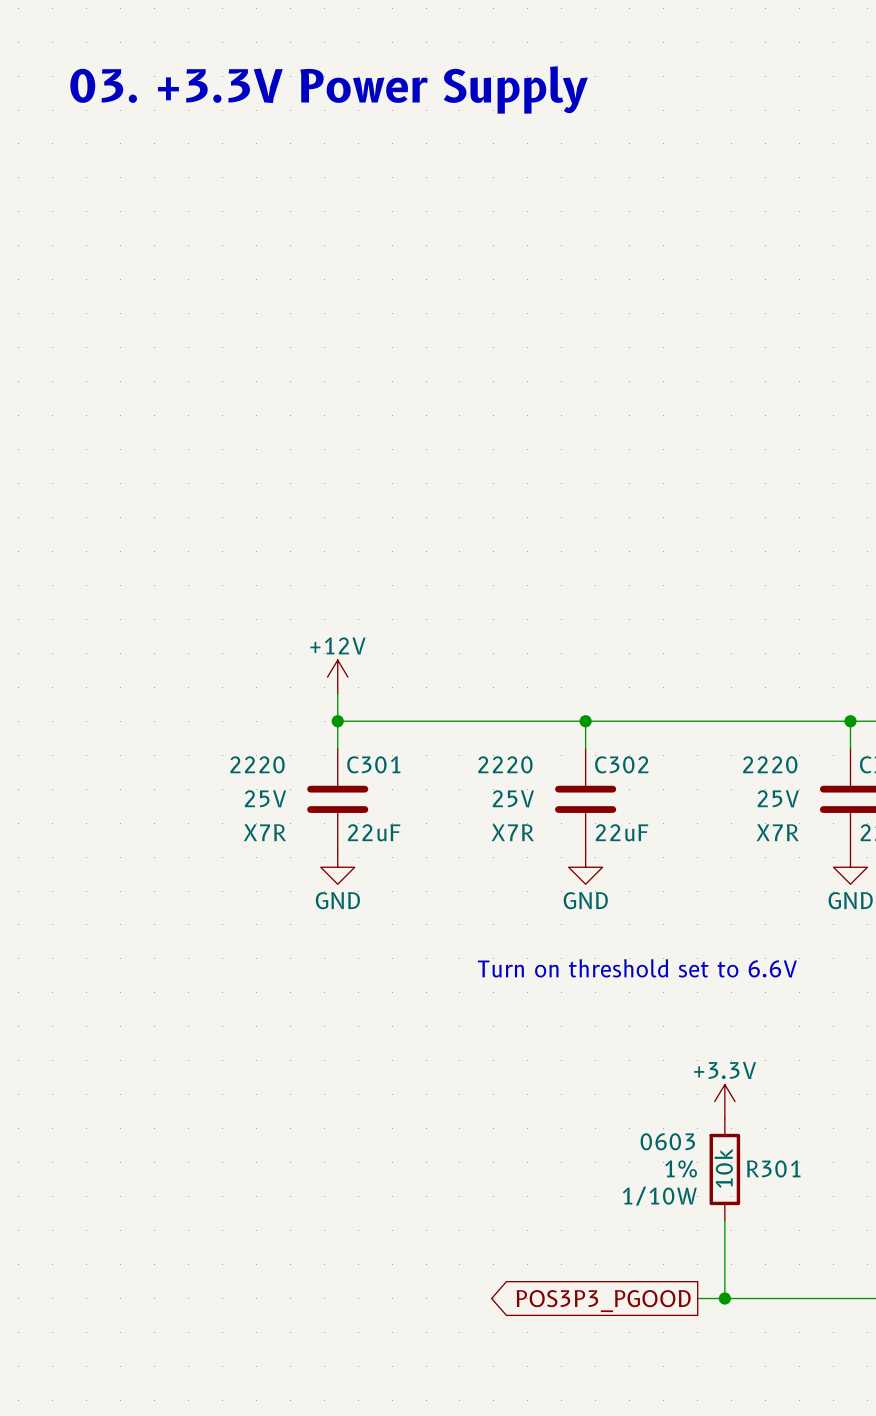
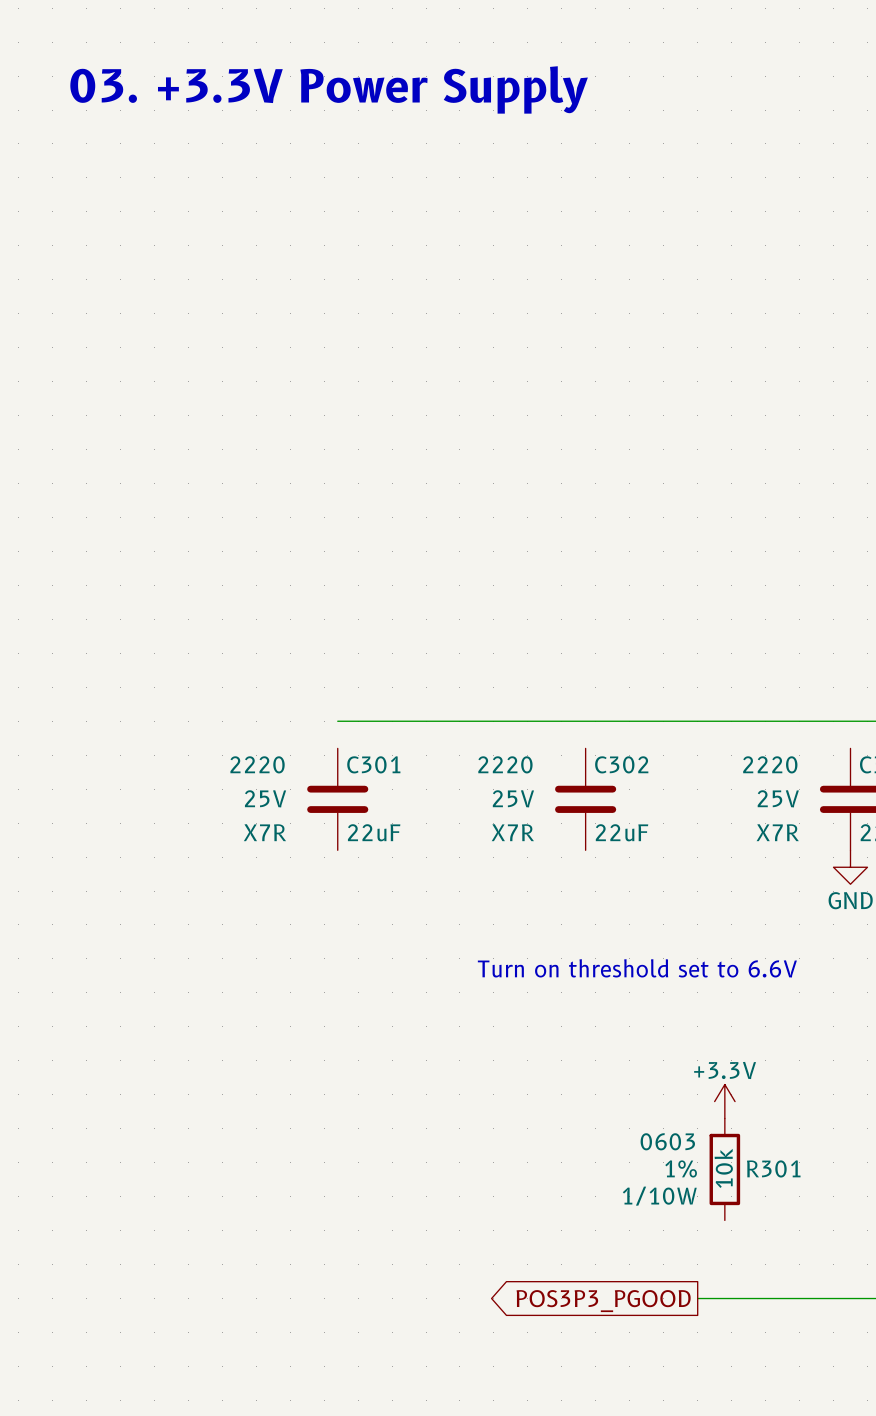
power symbol: +12V (337, 677) -> none
wire: (337, 694) (337, 748) -> none
junction: (337, 721) -> none
wire: (585, 721) (585, 748) -> none
junction: (585, 721) -> none
wire: (850, 721) (850, 748) -> none
junction: (850, 721) -> none
power symbol: GND (337, 867) -> none
power symbol: GND (585, 867) -> none
wire: (724, 1220) (724, 1298) -> none
junction: (724, 1298) -> none

